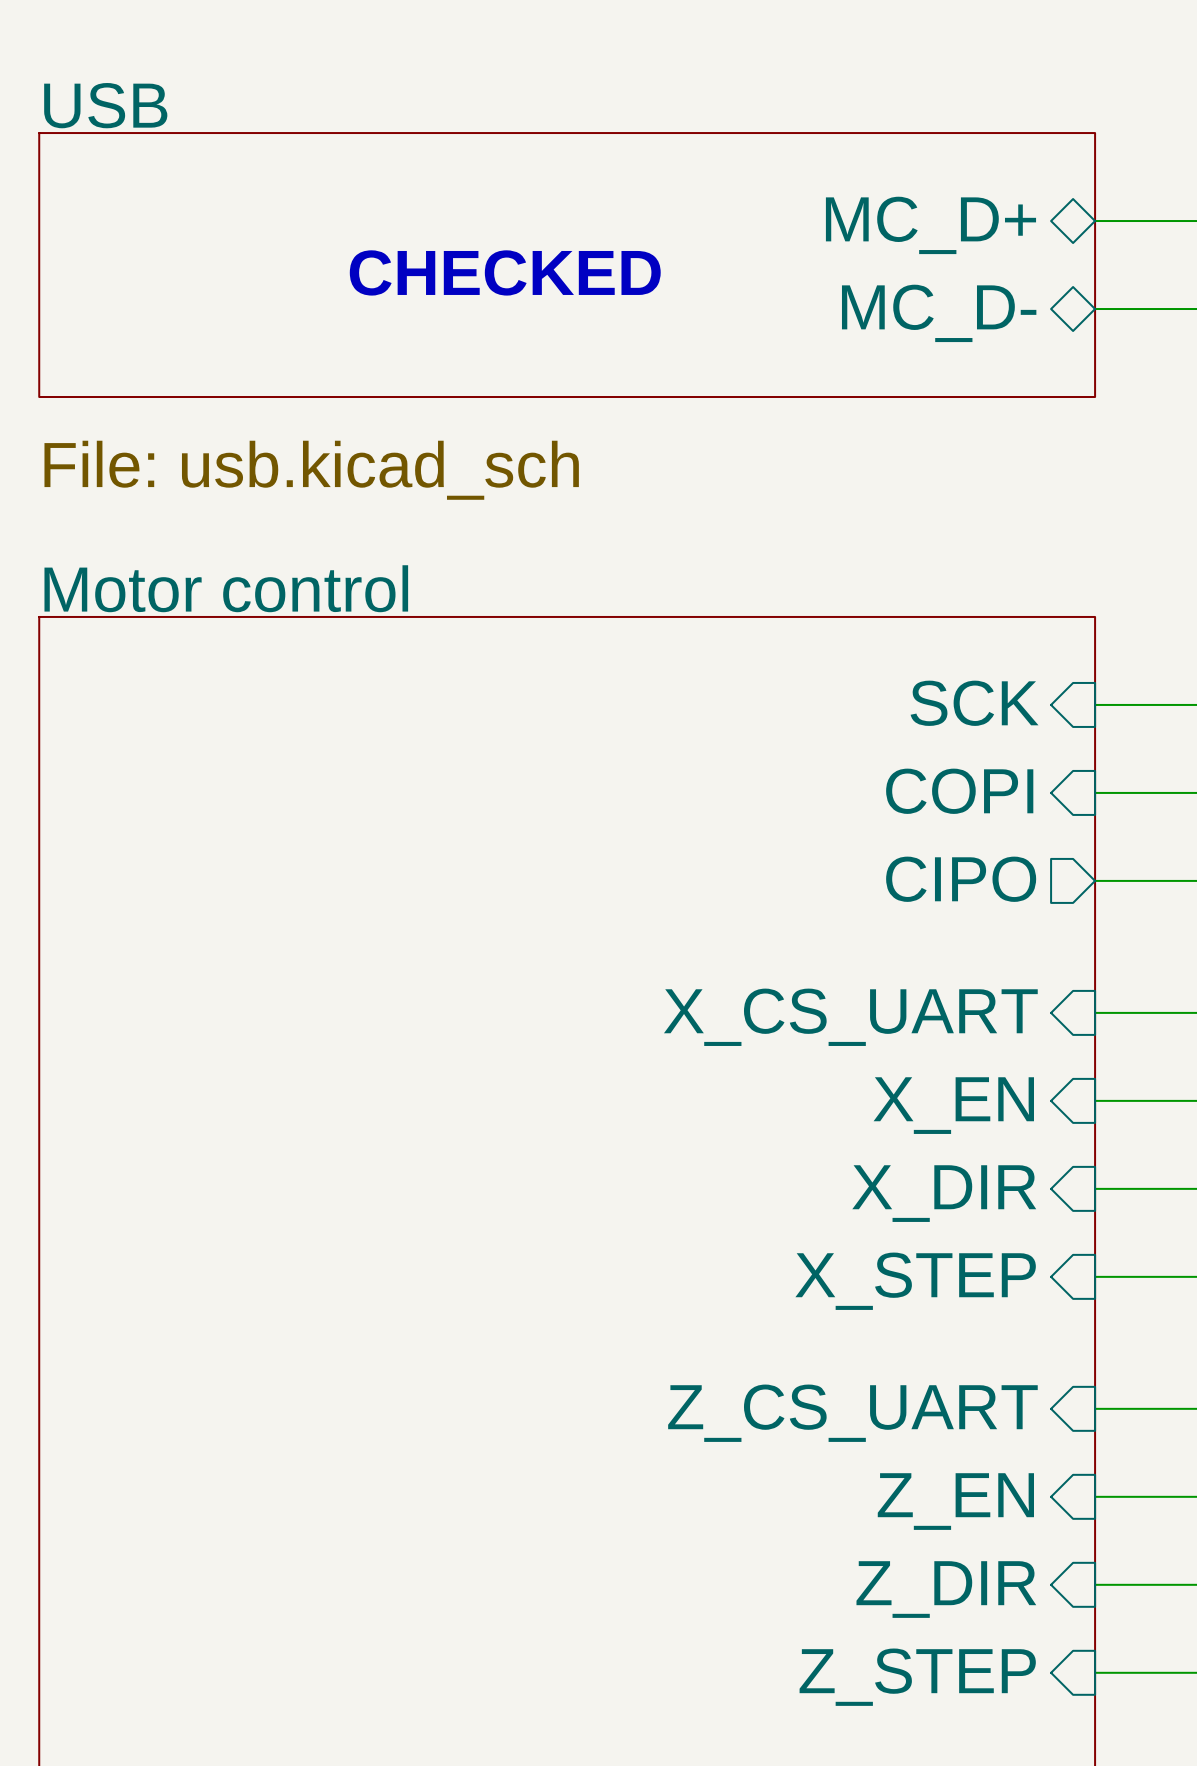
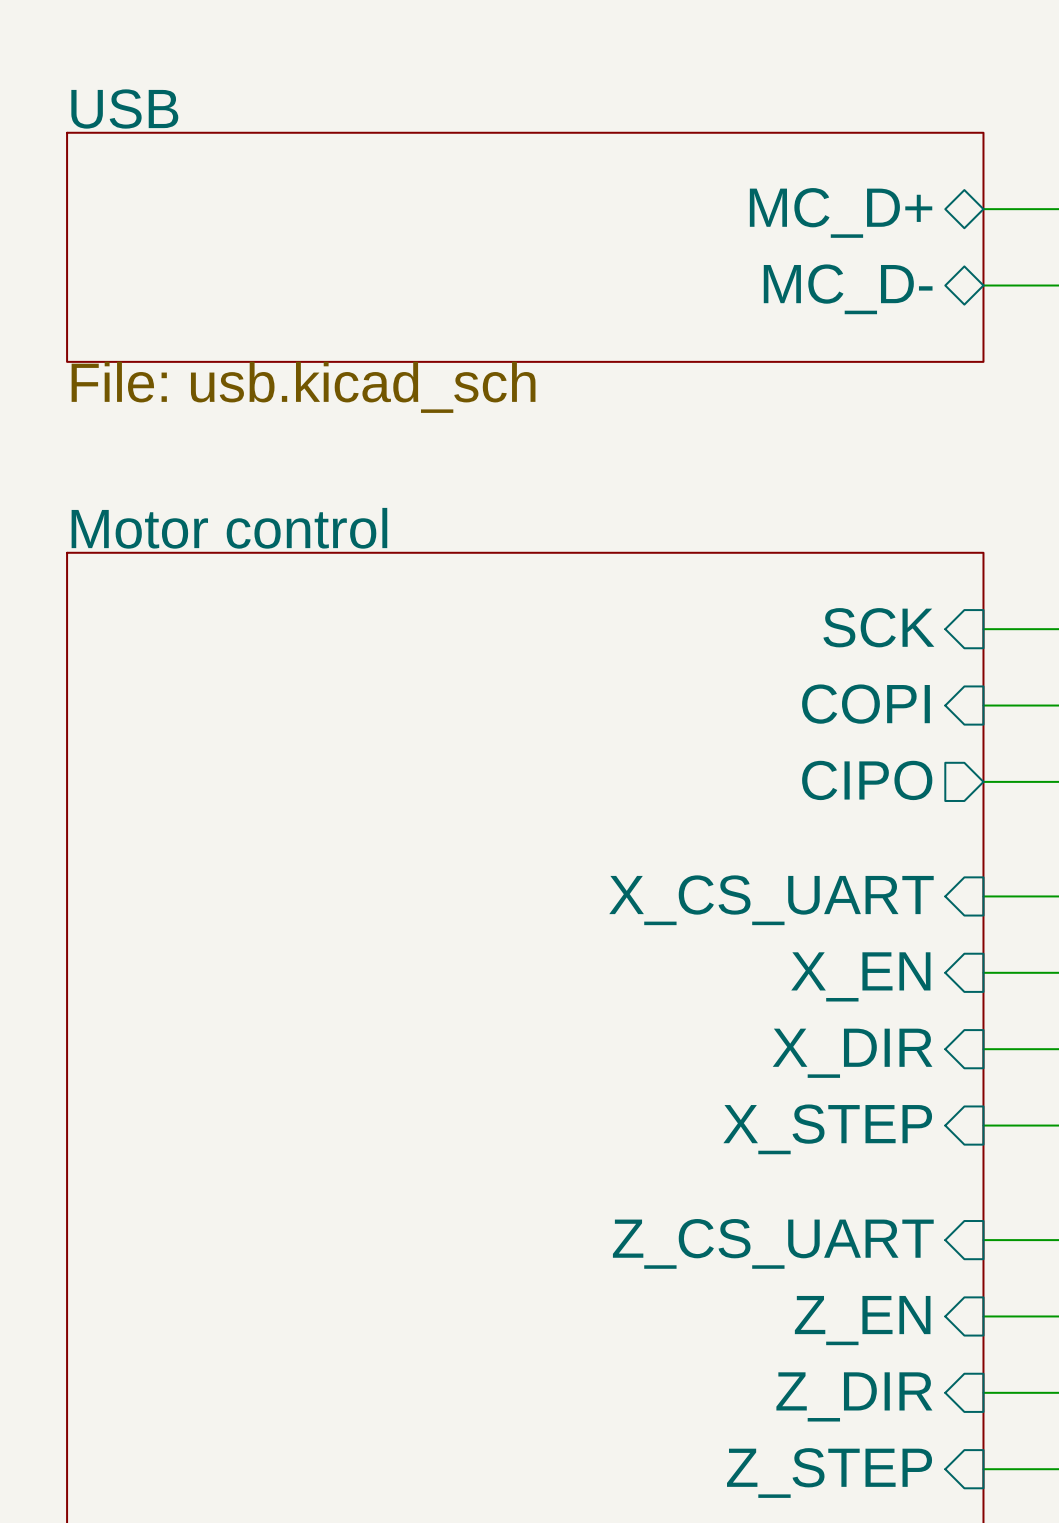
text: CHECKED (505, 272) -> none
sheet USB value position: File: usb.kicad_sch (311, 470) -> File: usb.kicad_sch (303, 387)

